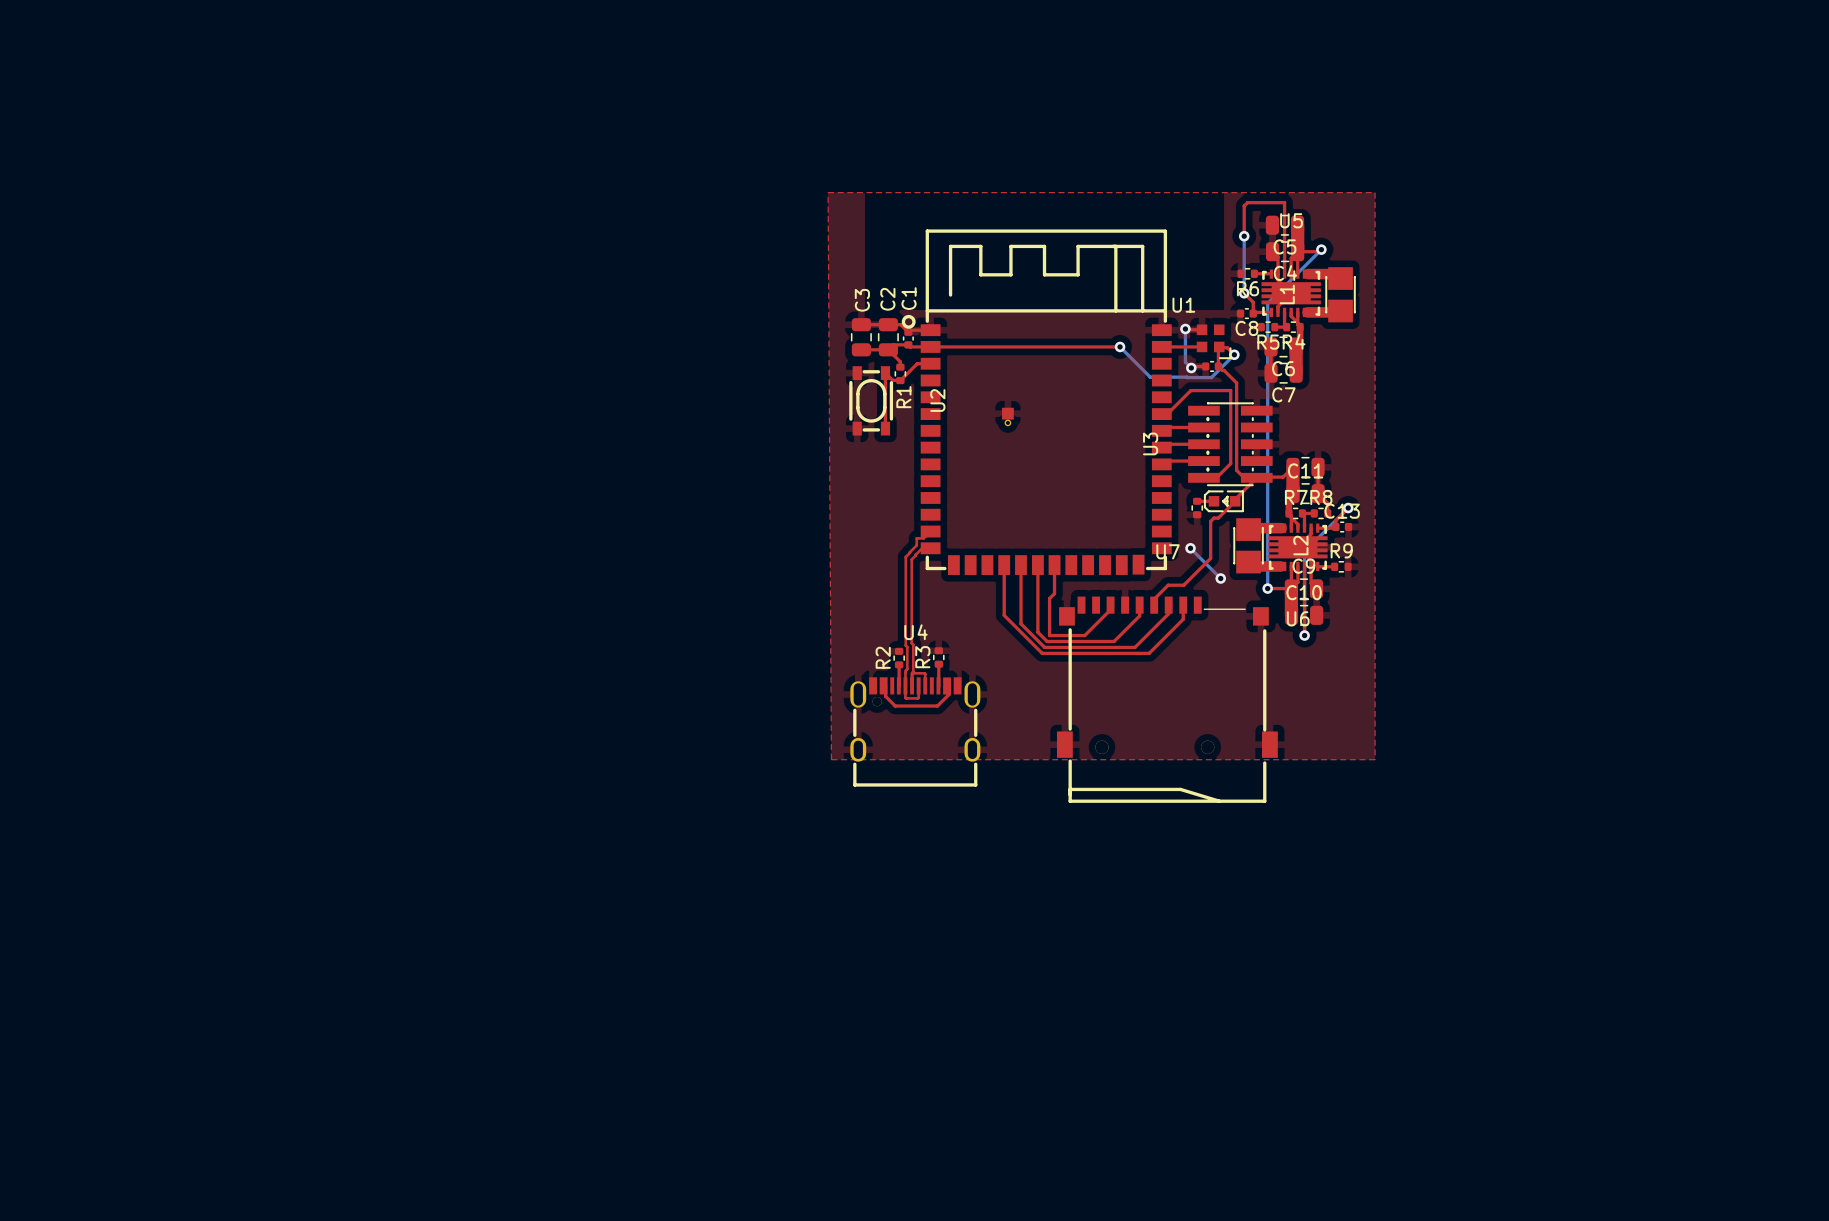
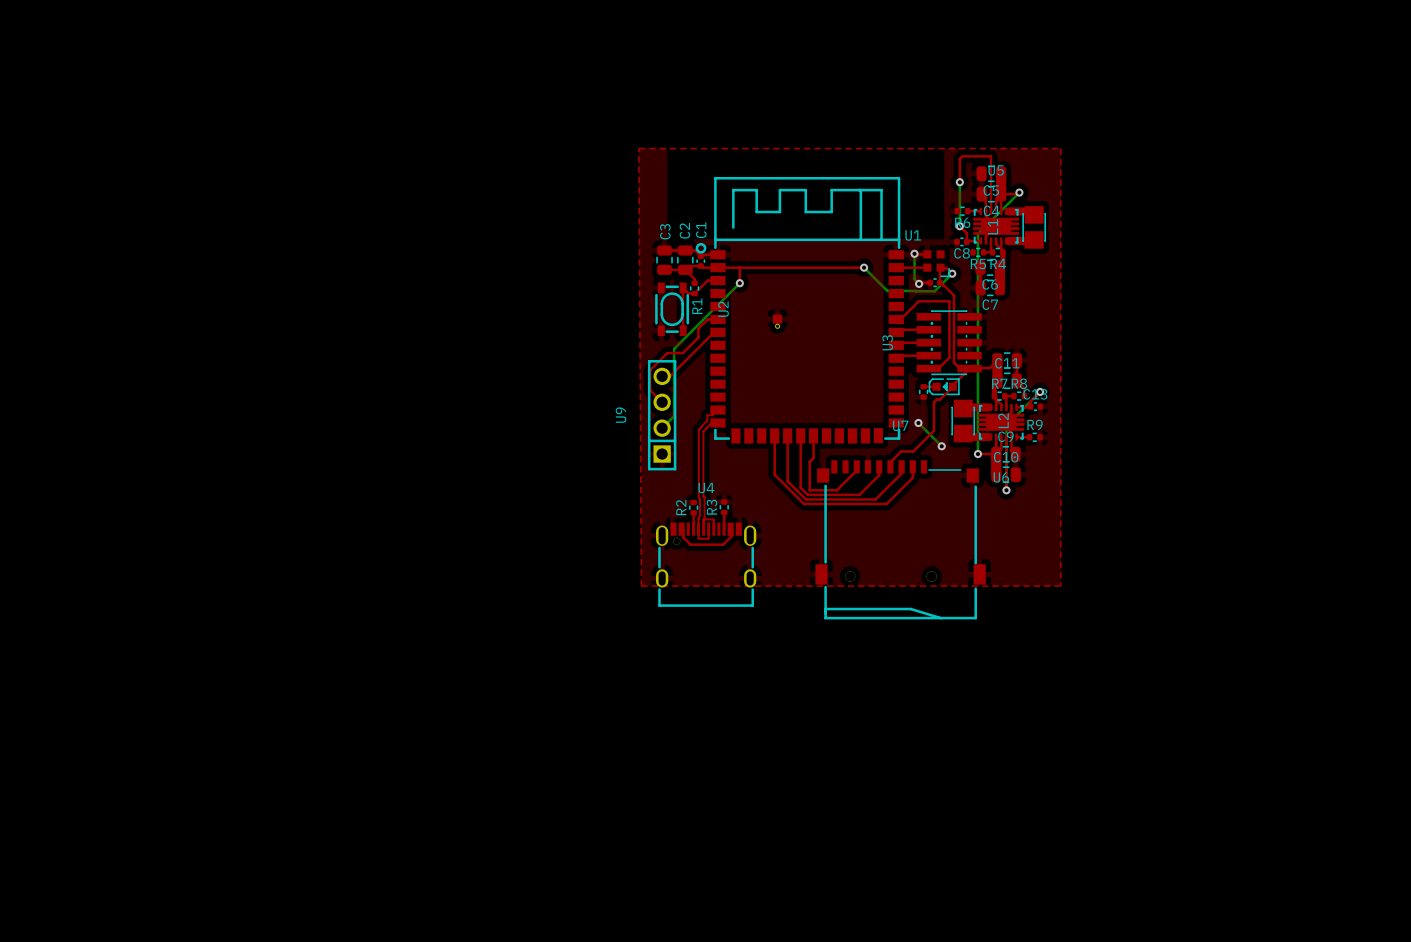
top track: none -> (739, 267) (739, 283)
bottom track: none -> (739, 283) (674, 348) (674, 416) (662, 428)
via: none -> (739, 283)
top track: none -> (717, 319) (707, 319) (698, 328) (698, 337) (682, 353) (667, 353) (650, 370) (650, 390) (662, 402)
top track: none -> (717, 332) (713, 332) (669, 376) (662, 376)
U9: none -> (662, 415)

